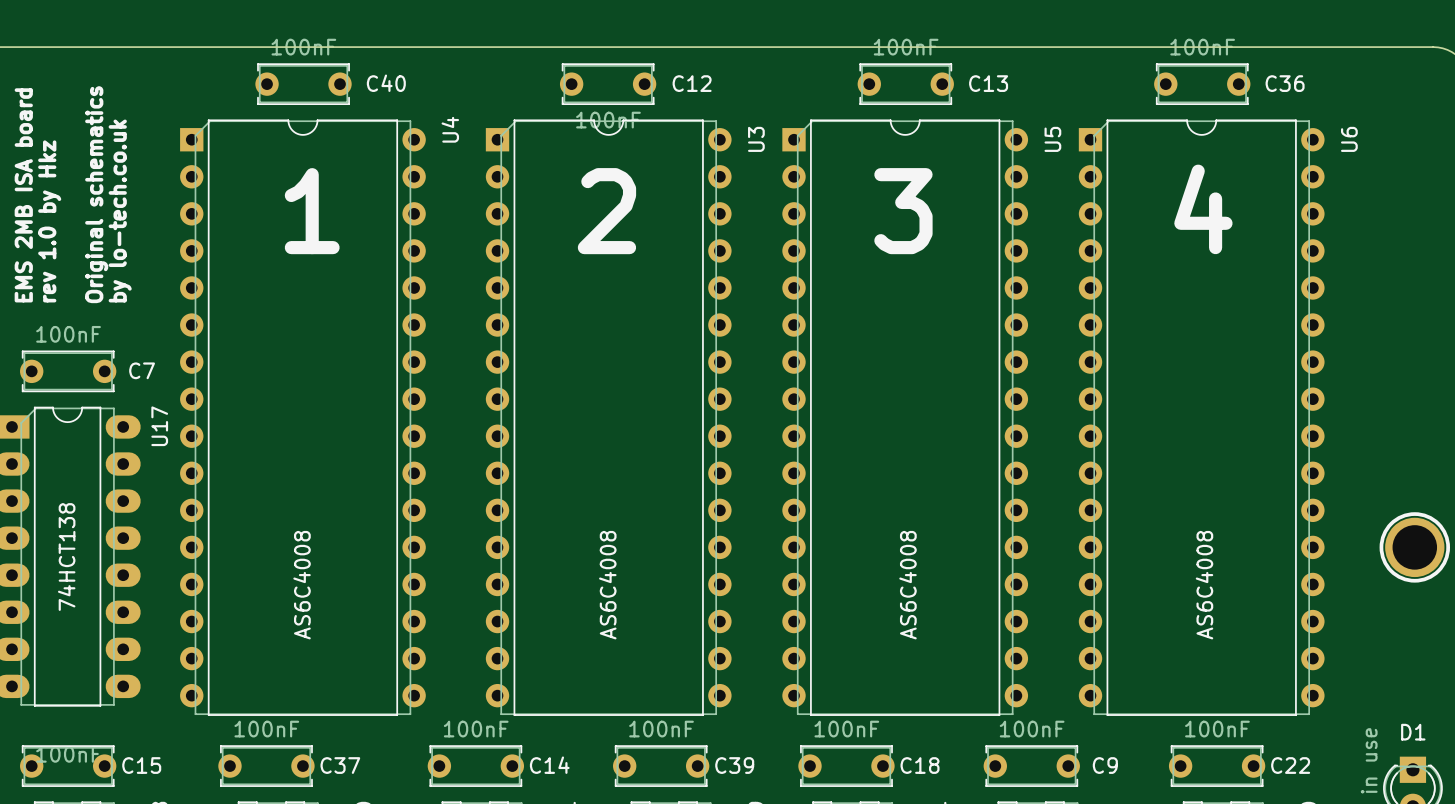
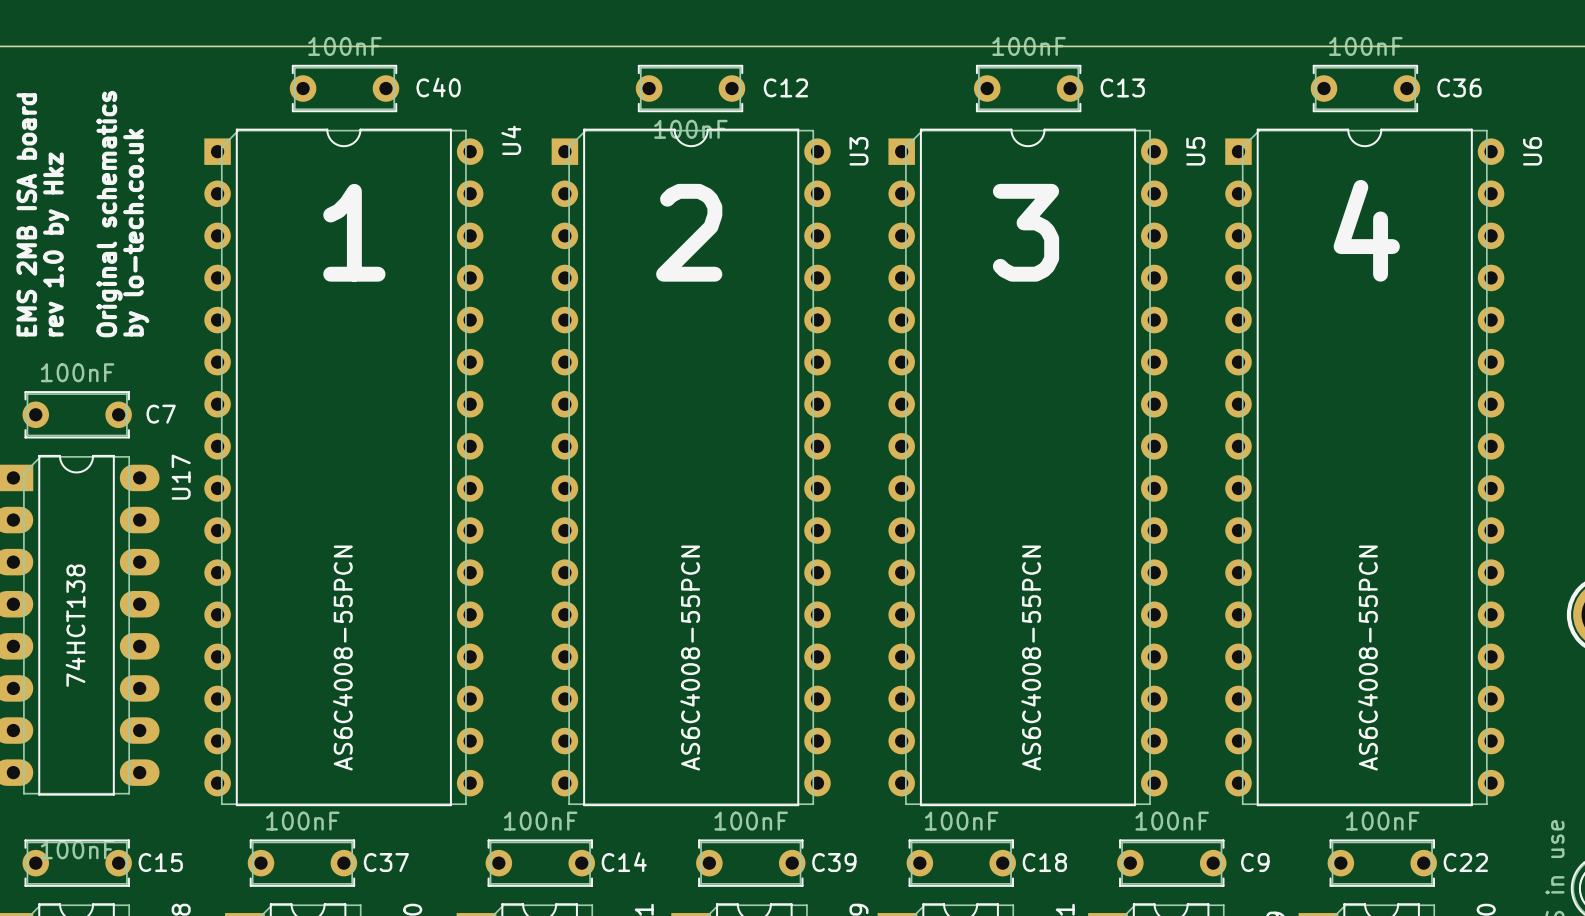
U4 value: AS6C4008 (302, 585) -> AS6C4008-55PCN (342, 658)
U3 value: AS6C4008 (607, 585) -> AS6C4008-55PCN (690, 658)
U5 value: AS6C4008 (908, 585) -> AS6C4008-55PCN (1031, 658)
U6 value: AS6C4008 (1204, 585) -> AS6C4008-55PCN (1367, 658)

